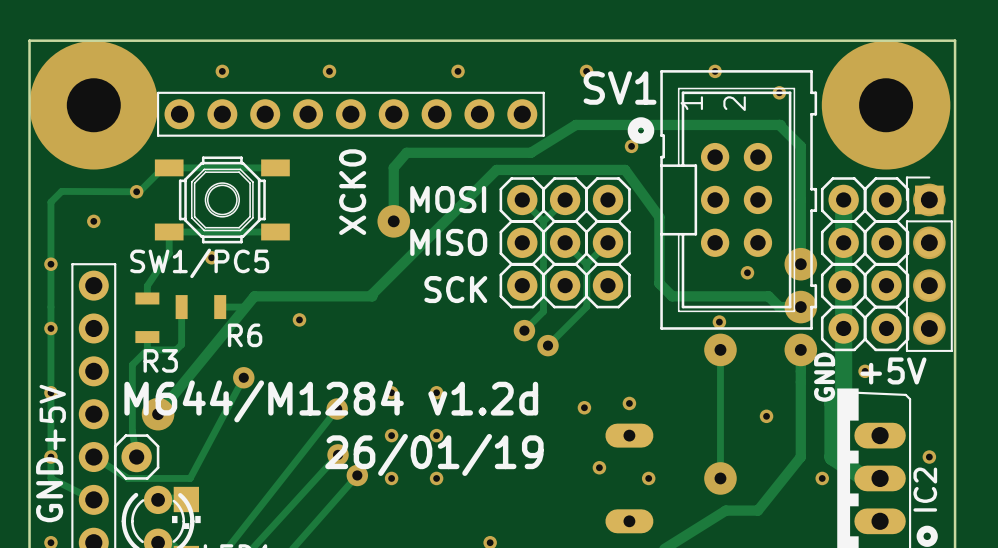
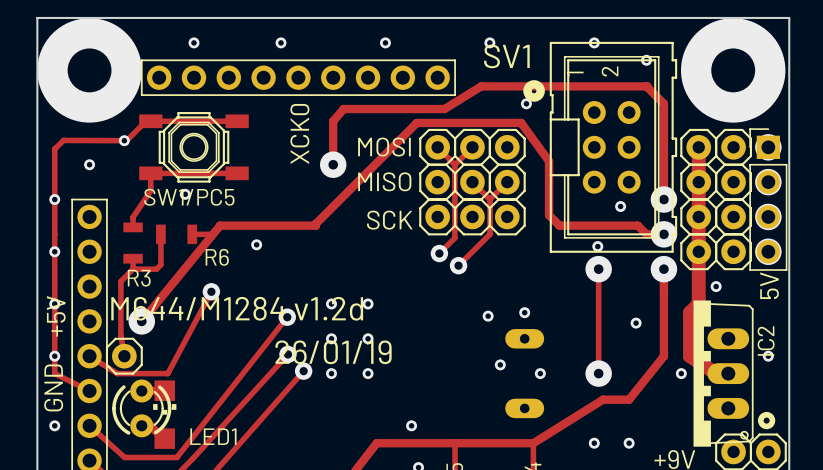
text: +5V (893, 370) -> 5V (769, 285)
text: GND (824, 377) -> none
IC2 name position: IC2 (925, 489) -> IC2 (766, 341)

